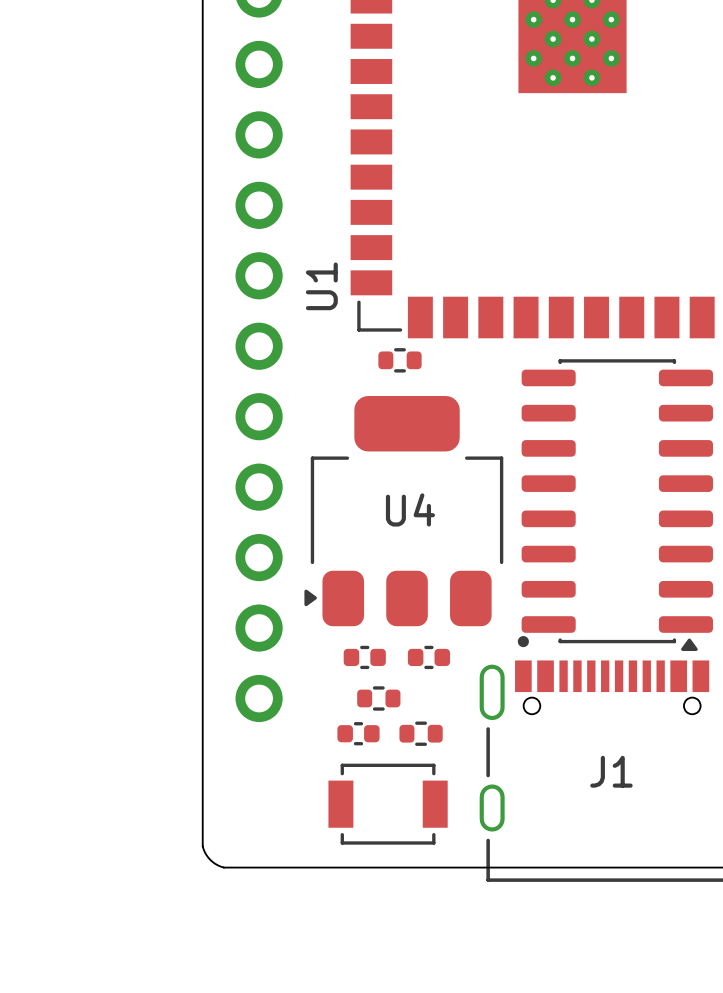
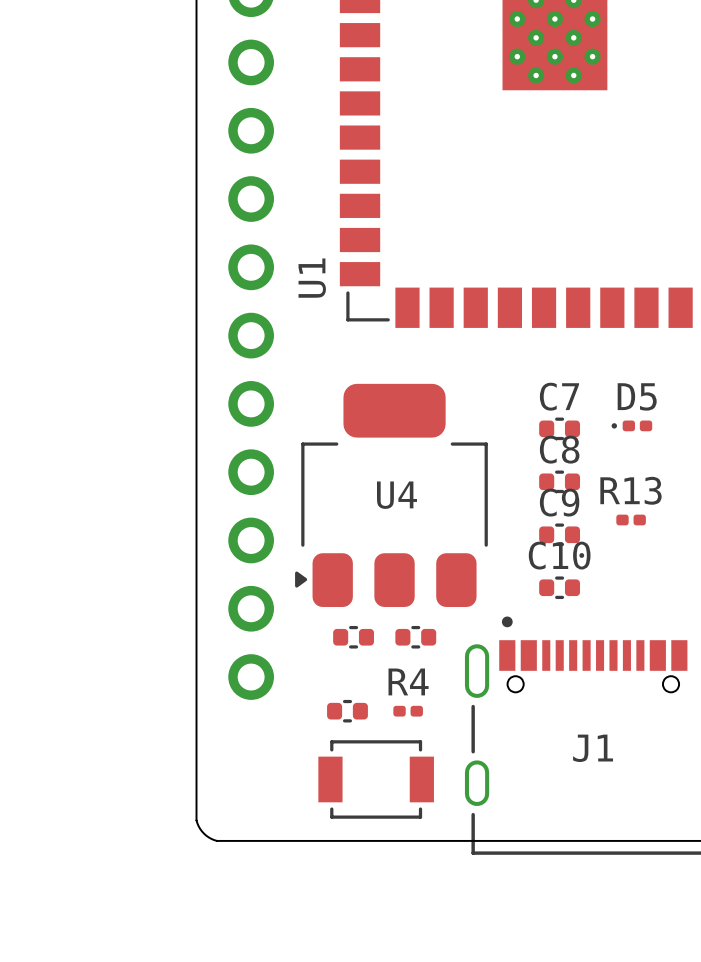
part: (399, 360) -> none
D5: none -> (631, 425)
C7: none -> (559, 428)
C8: none -> (559, 481)
part: (617, 505) -> none
R13: none -> (631, 519)
C9: none -> (559, 534)
C10: none -> (559, 587)
part: (378, 698) -> none
part: (421, 733) -> none
R4: none -> (408, 711)

